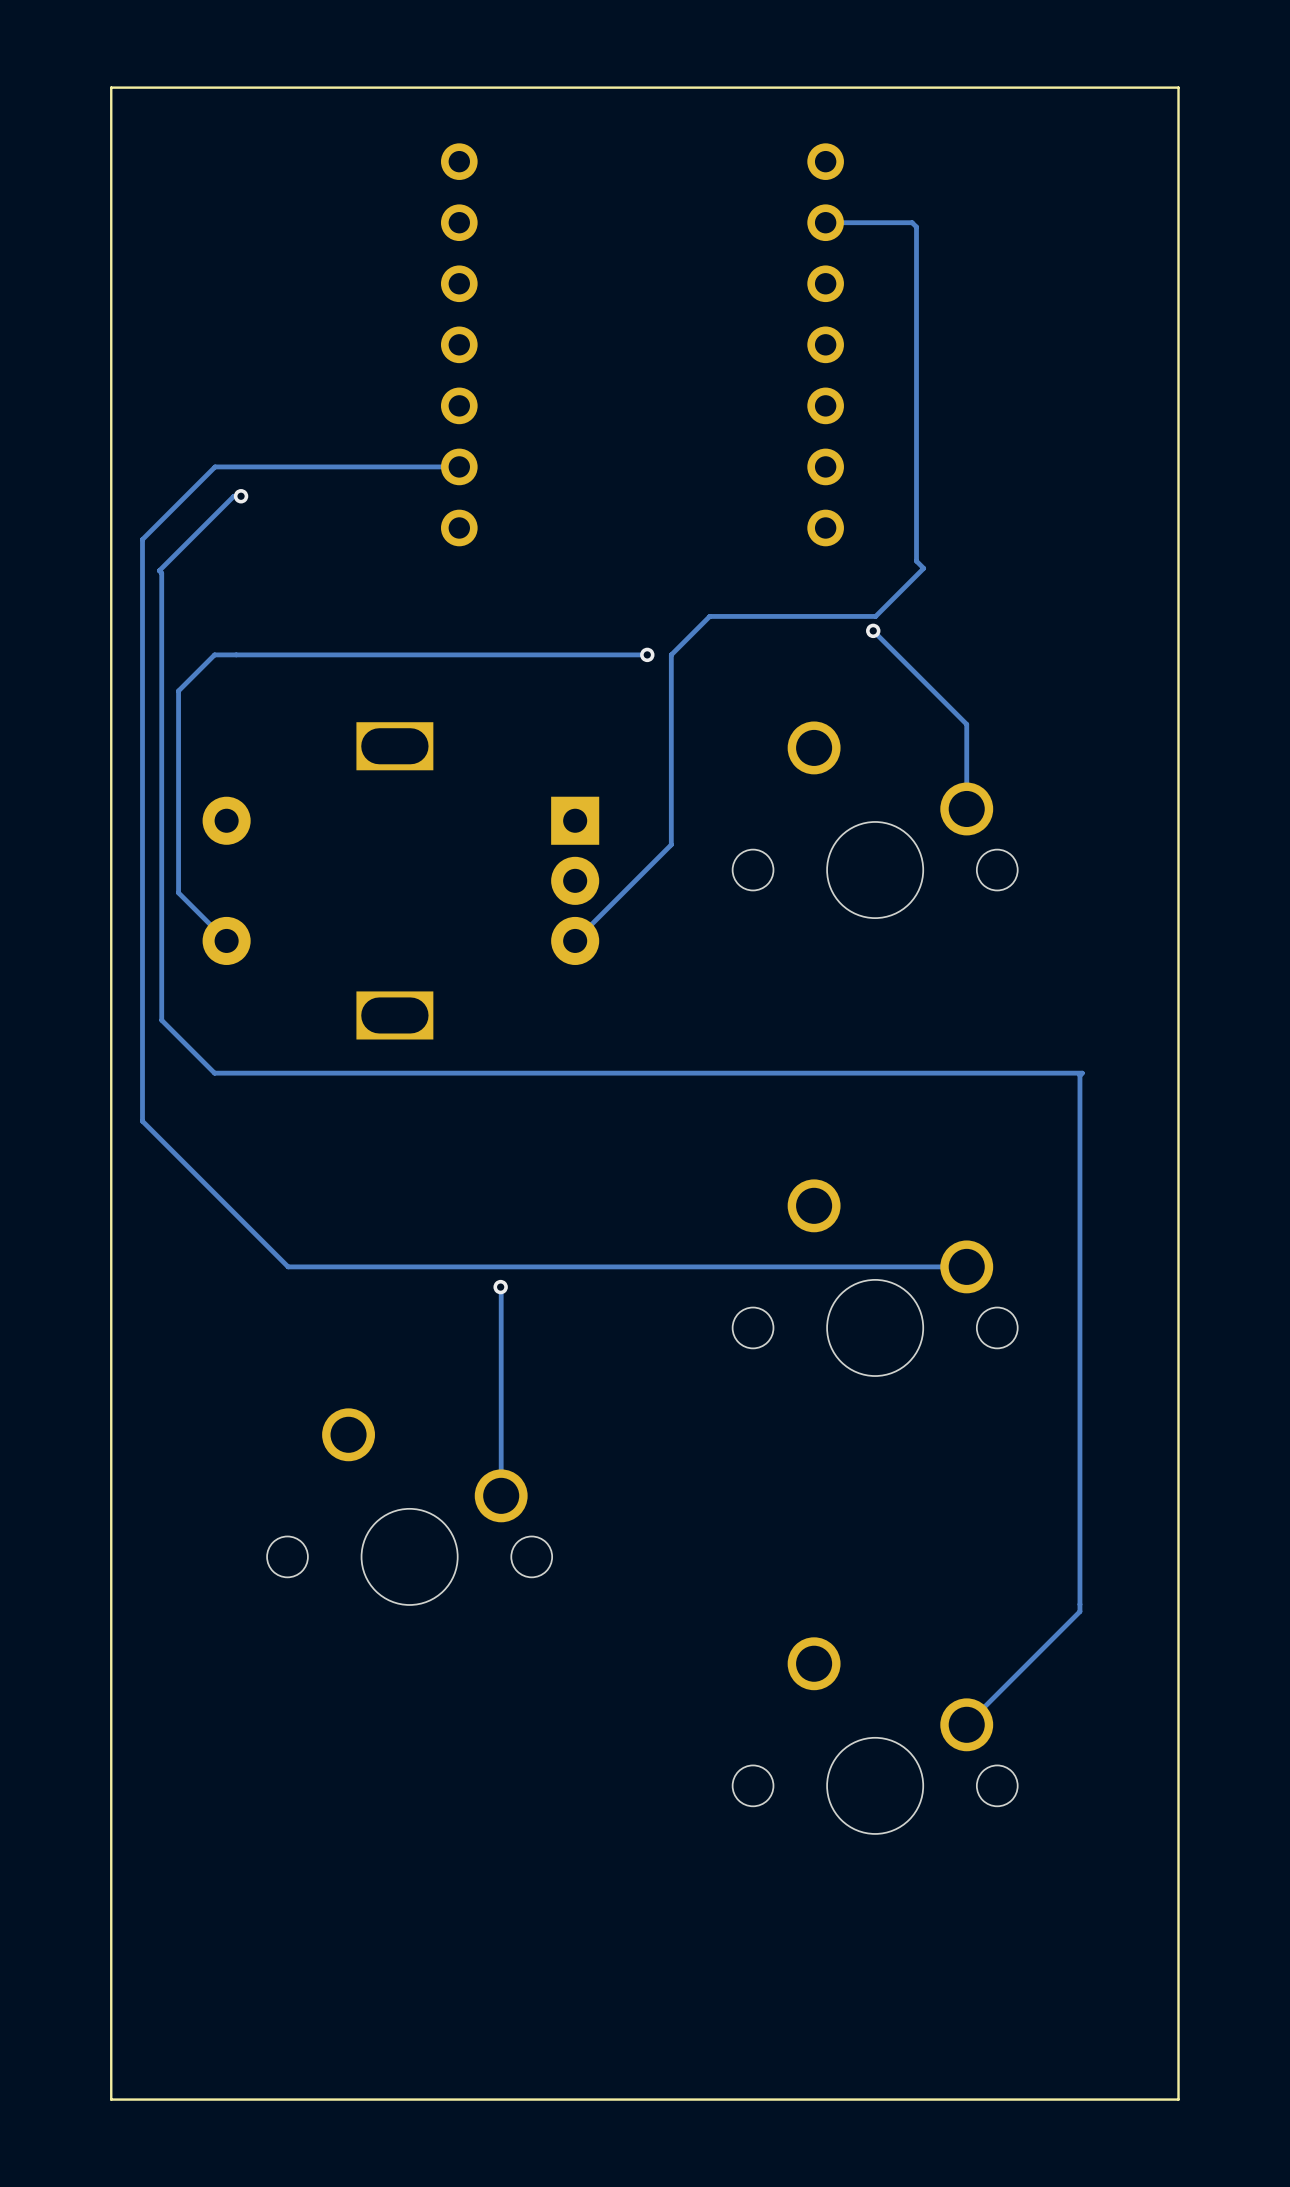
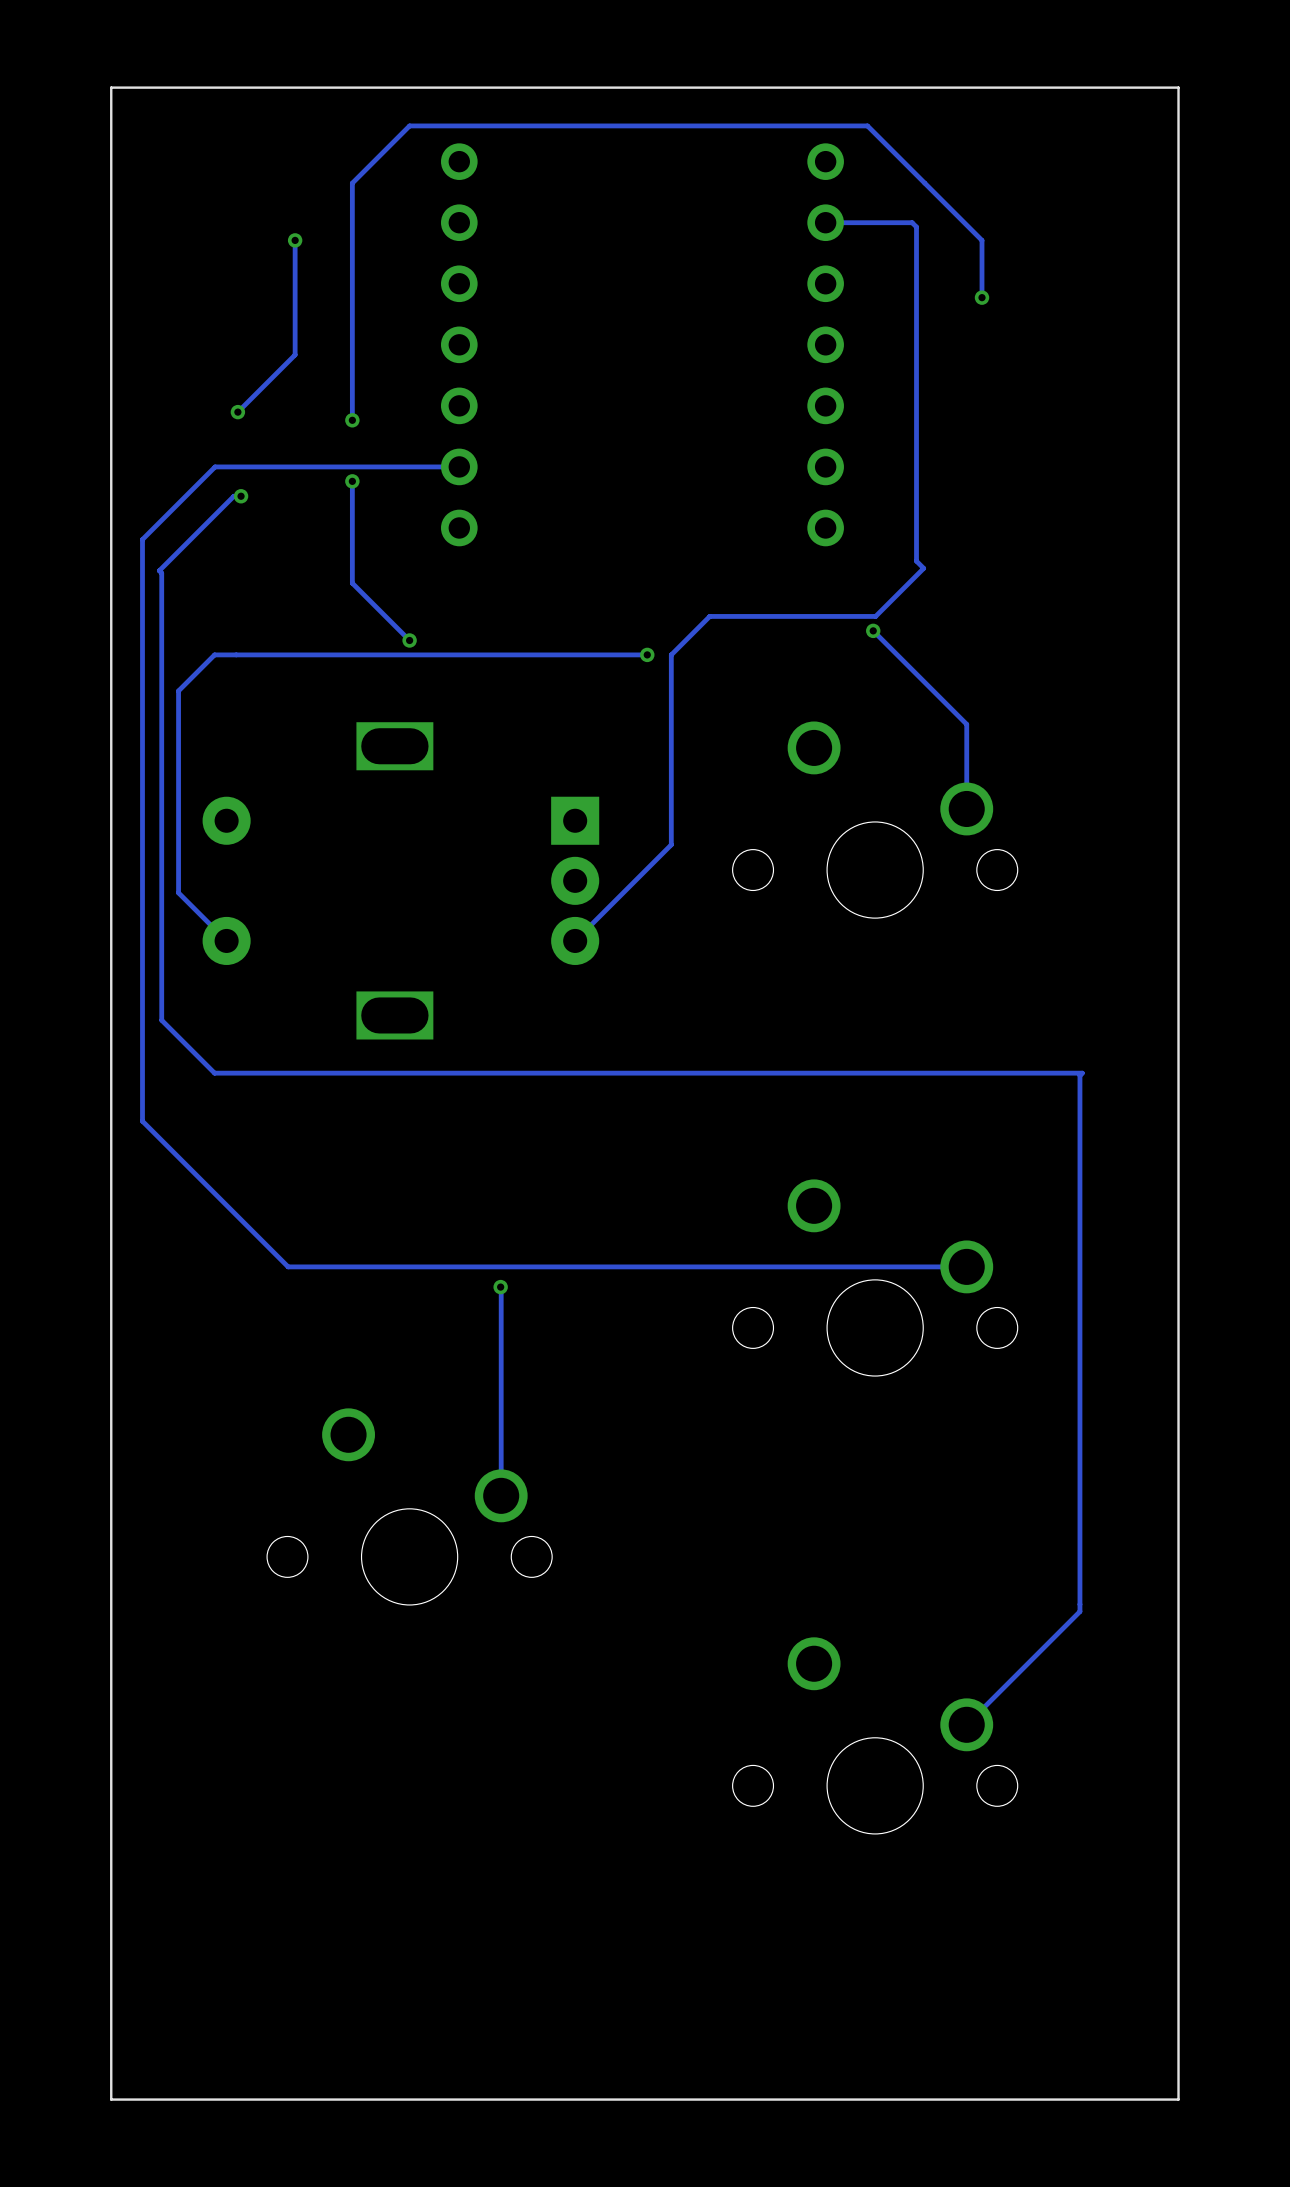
track: none -> (295, 240) (295, 354) (237, 412)
via: none -> (295, 240)
track: none -> (982, 297) (982, 240) (867, 125) (409, 125) (352, 183) (352, 420)
via: none -> (982, 297)
via: none -> (237, 412)
via: none -> (352, 420)
track: none -> (352, 481) (352, 583) (409, 640)
via: none -> (352, 481)
via: none -> (409, 640)

